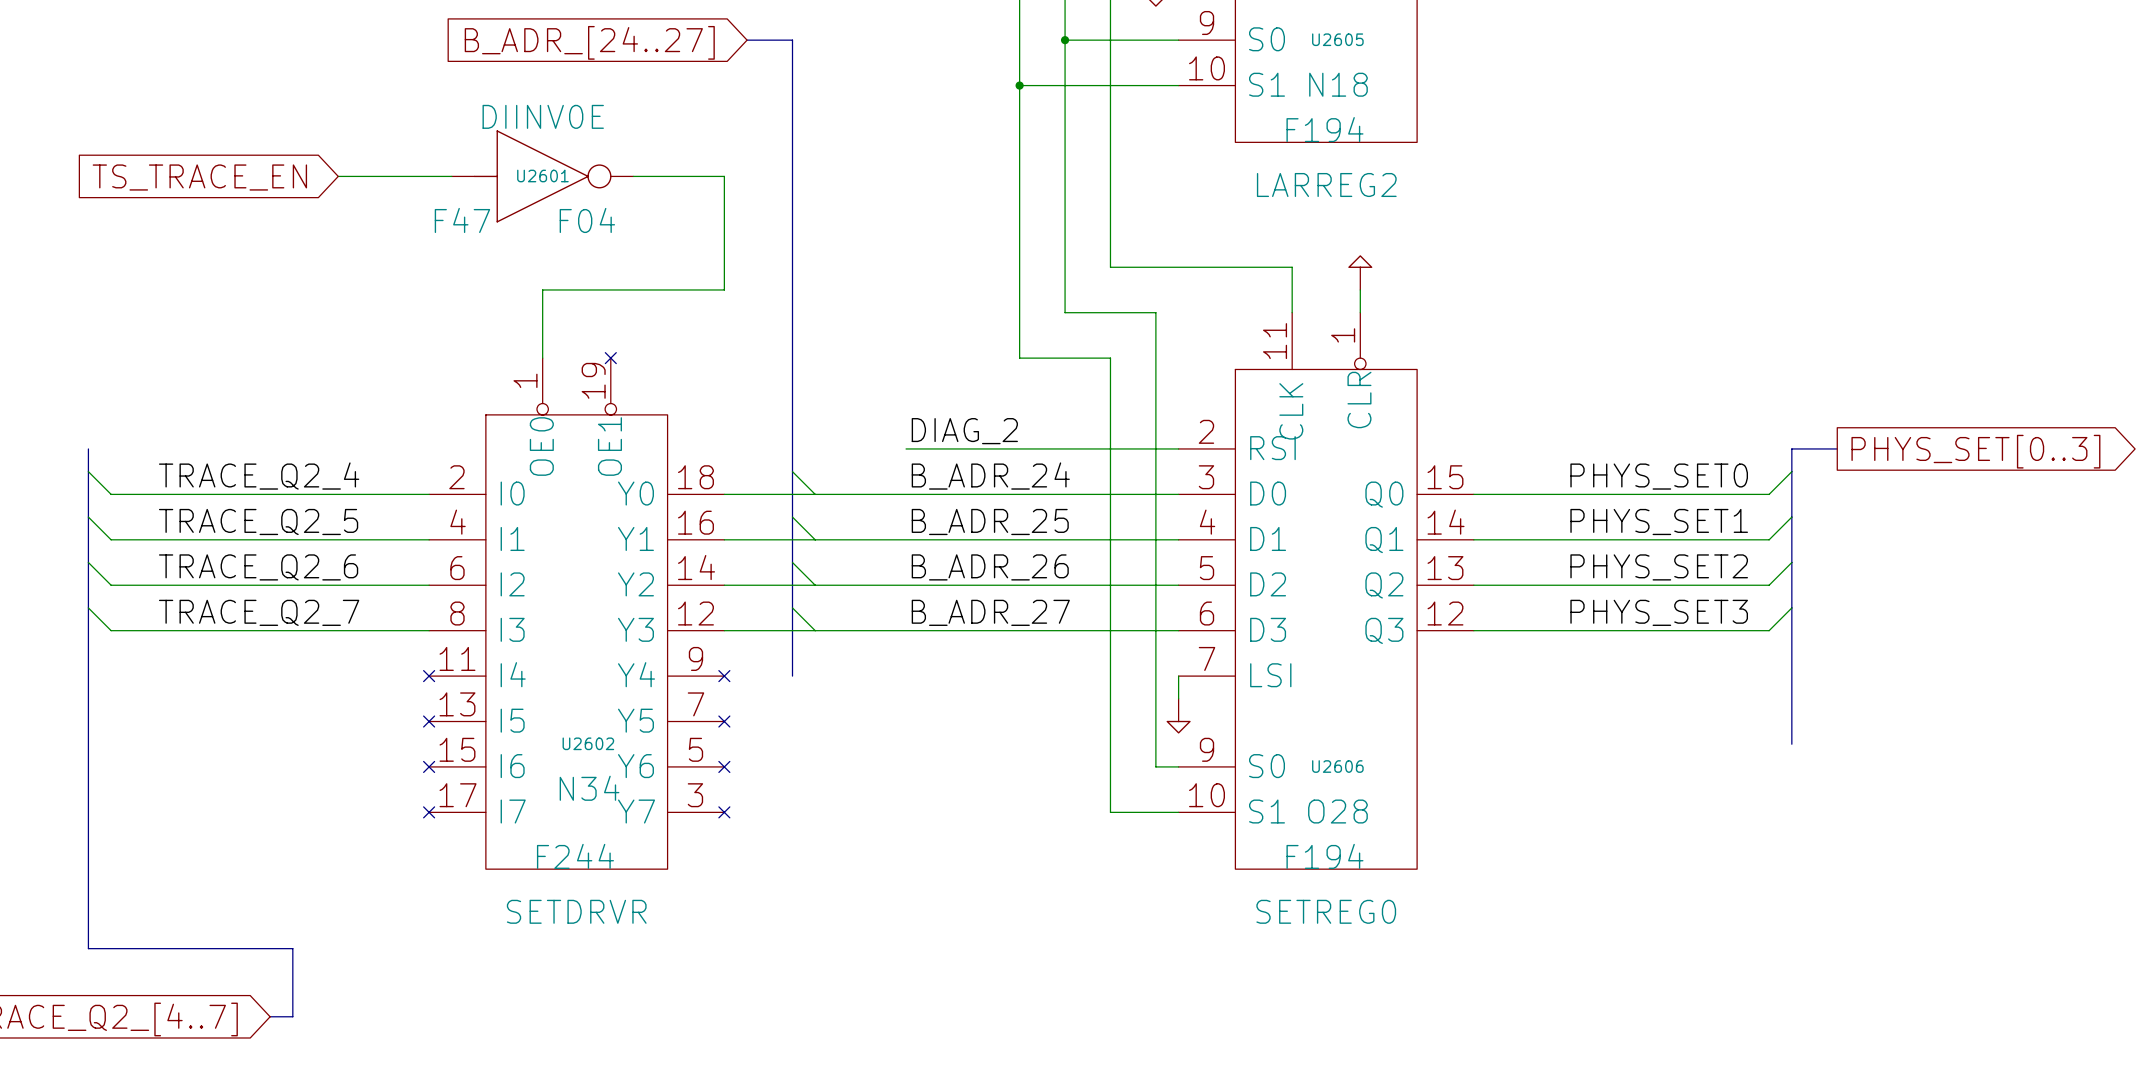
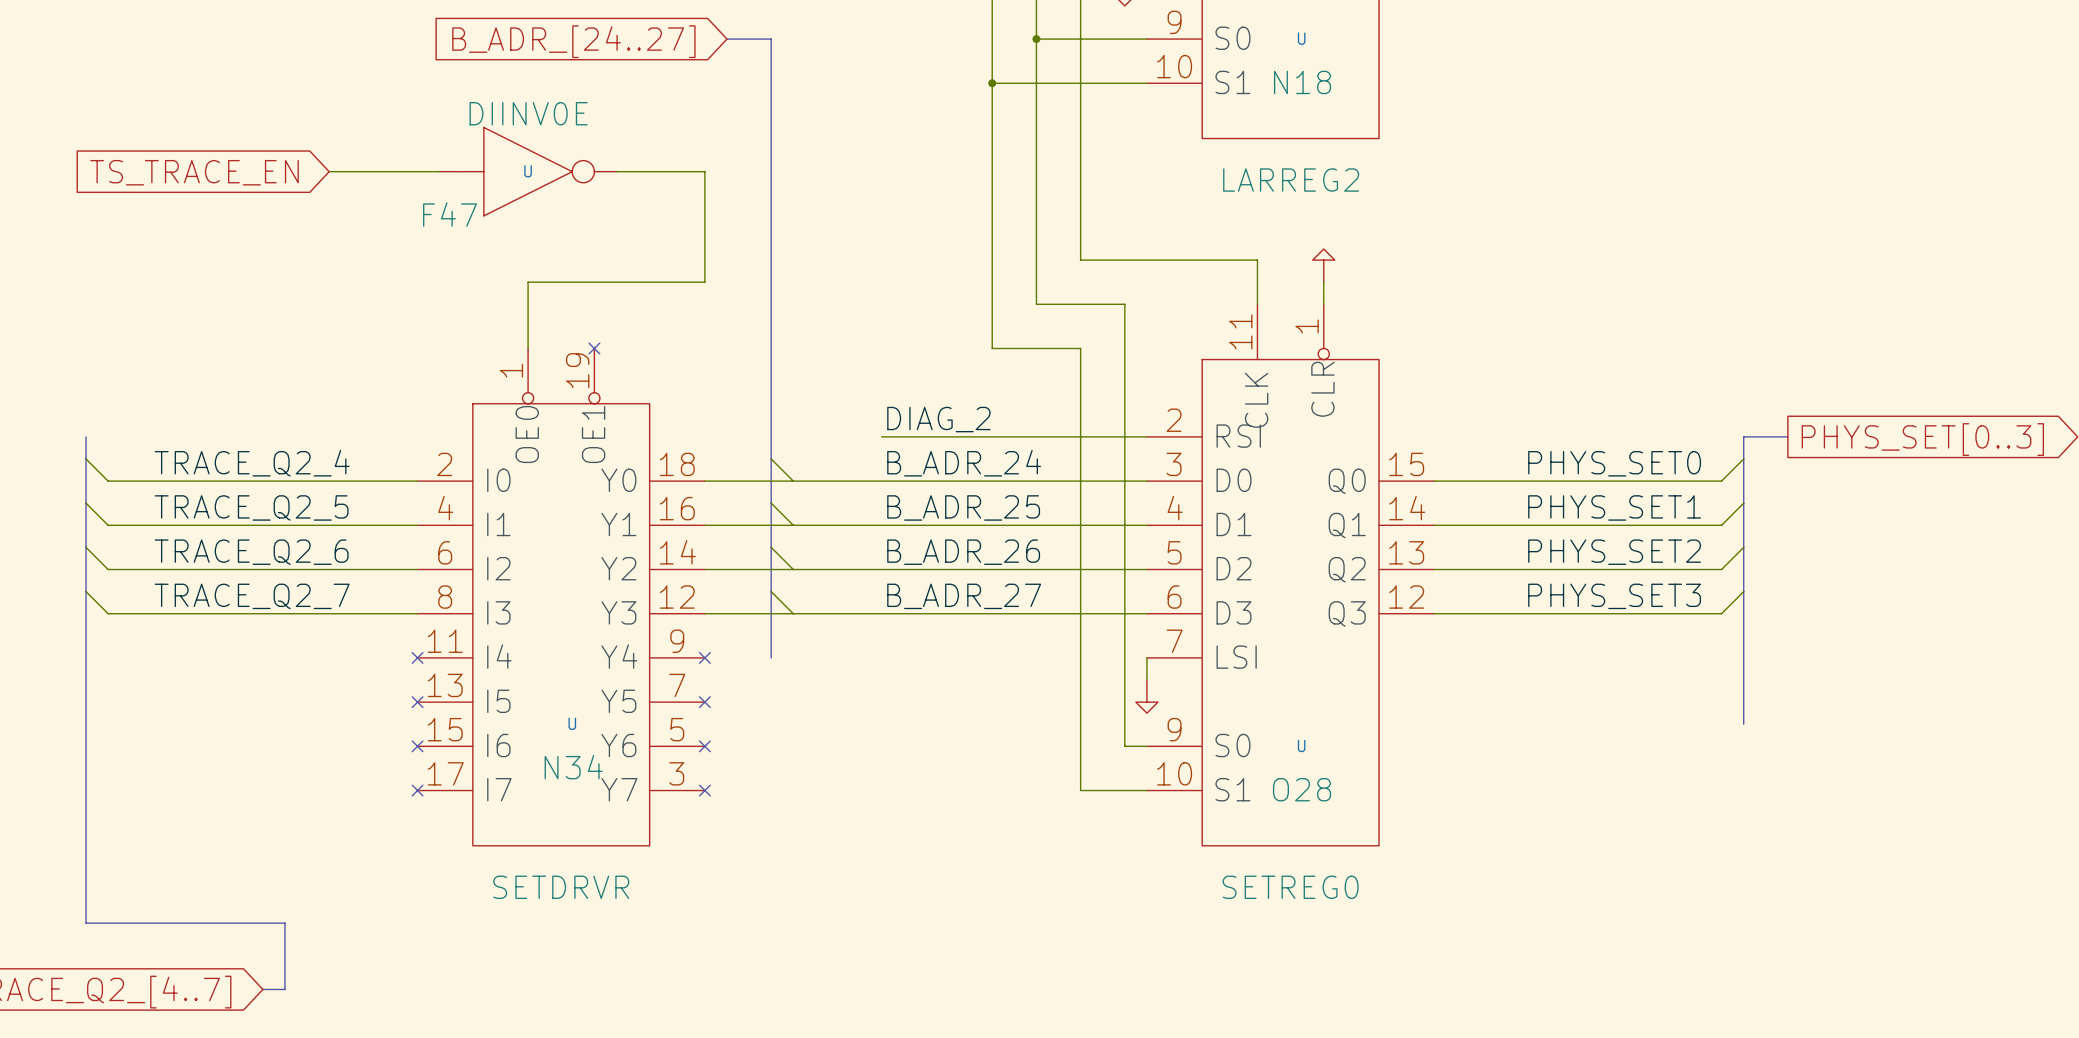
U2605 name: U2605 (1337, 39) -> U (1301, 38)
U2605 value: F194 (1324, 129) -> none
U2601 name: U2601 (542, 175) -> U (528, 171)
U2601 value: F04 (587, 220) -> none
U2602 name: U2602 (588, 743) -> U (572, 723)
U2606 name: U2606 (1337, 766) -> U (1301, 745)
U2602 value: F244 (575, 856) -> none
U2606 value: F194 (1324, 856) -> none

